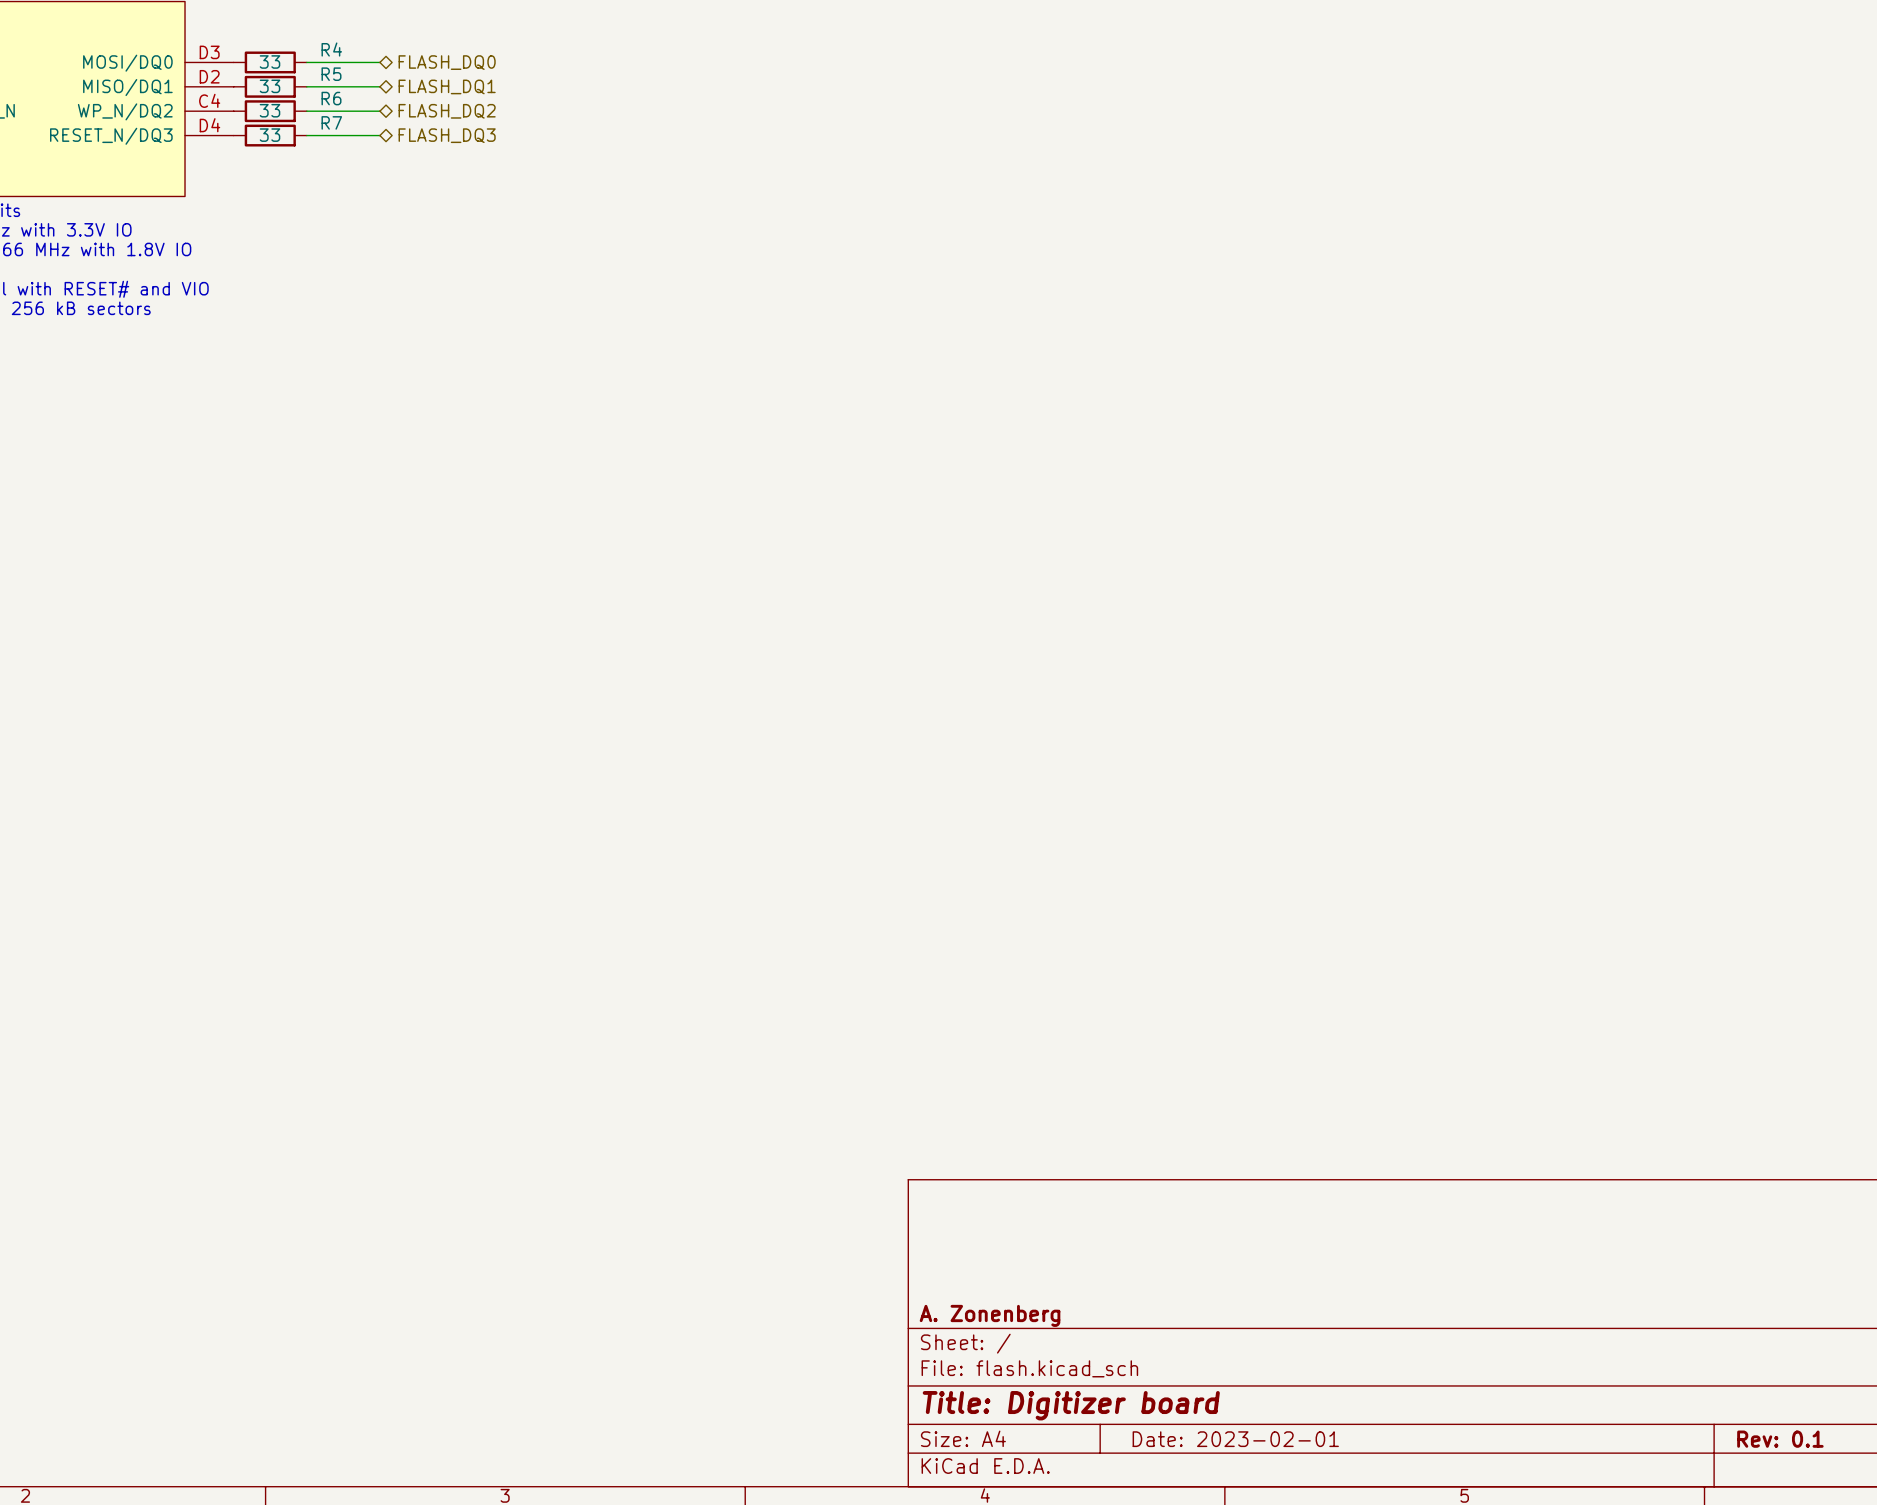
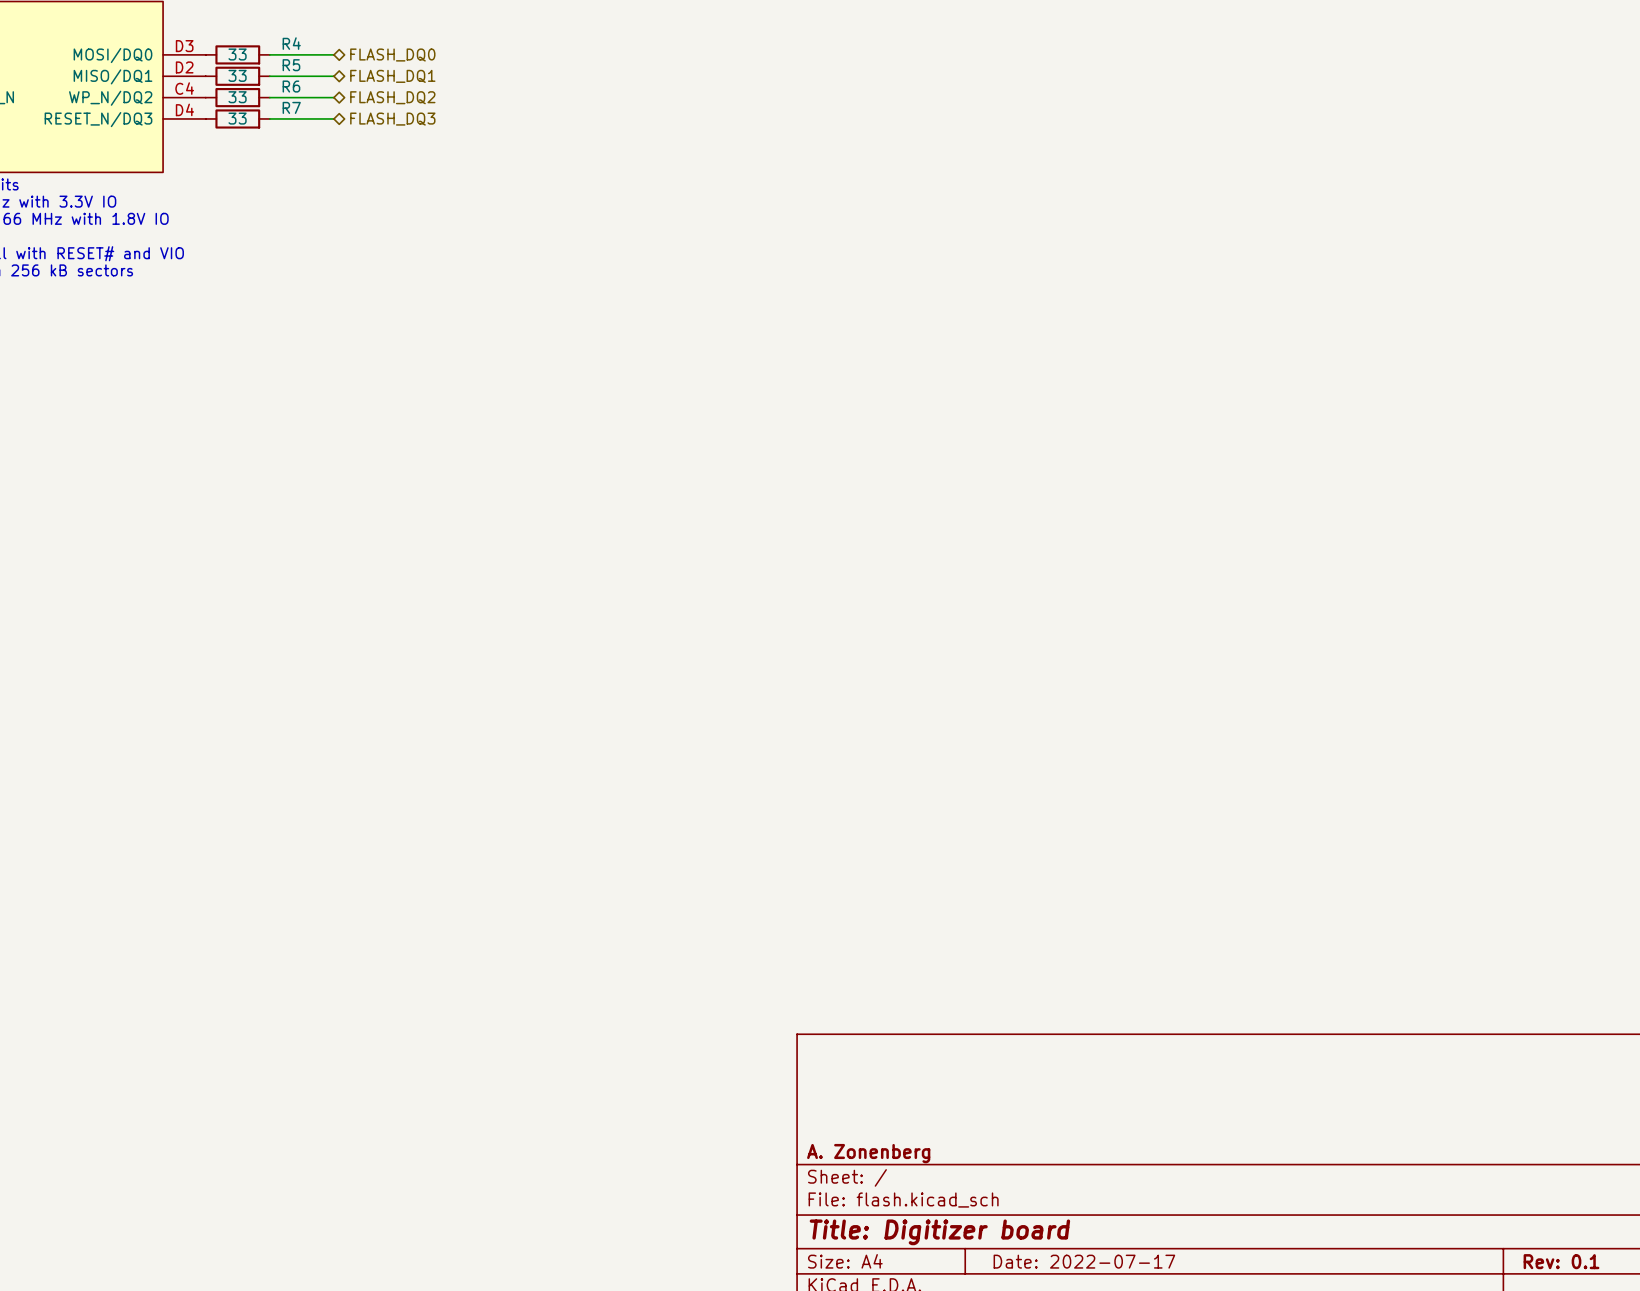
title block: Date: 2023-02-01 (1235, 1439) -> Date: 2022-07-17 (1084, 1261)

